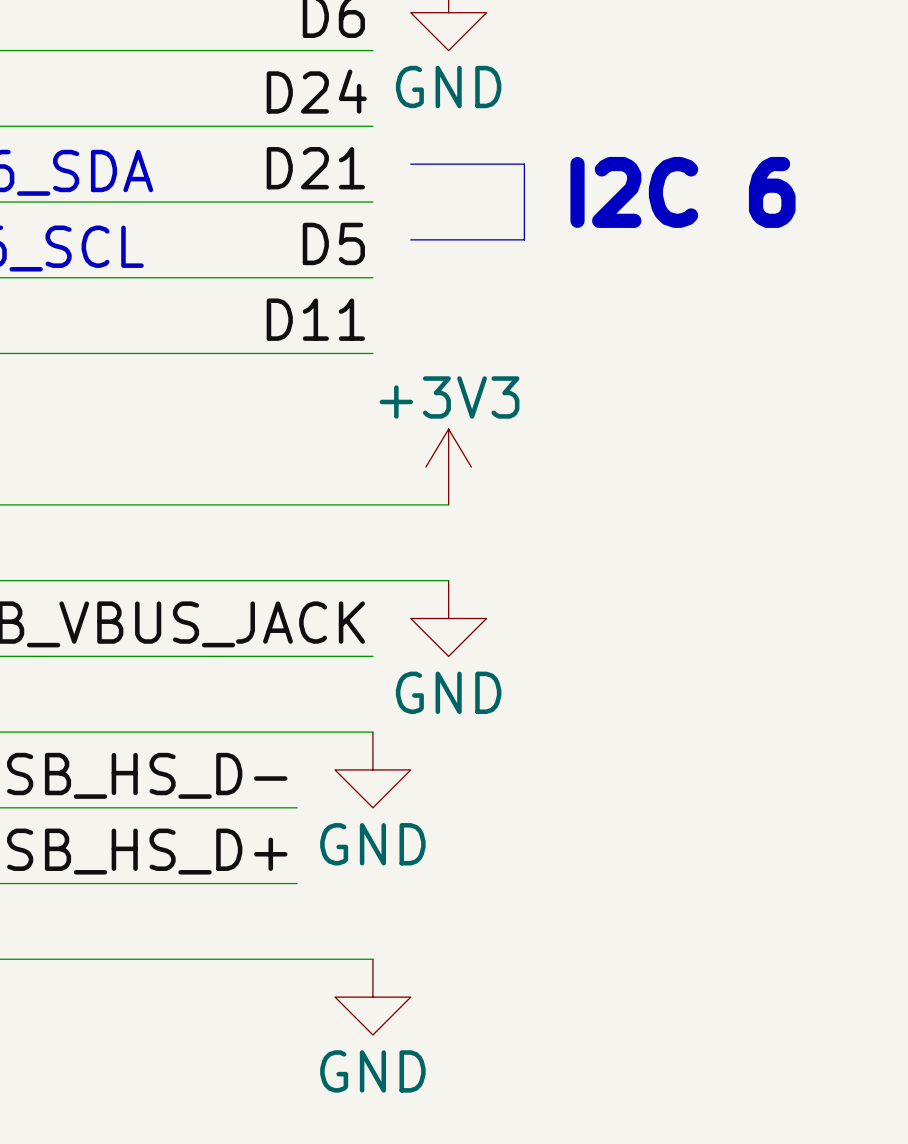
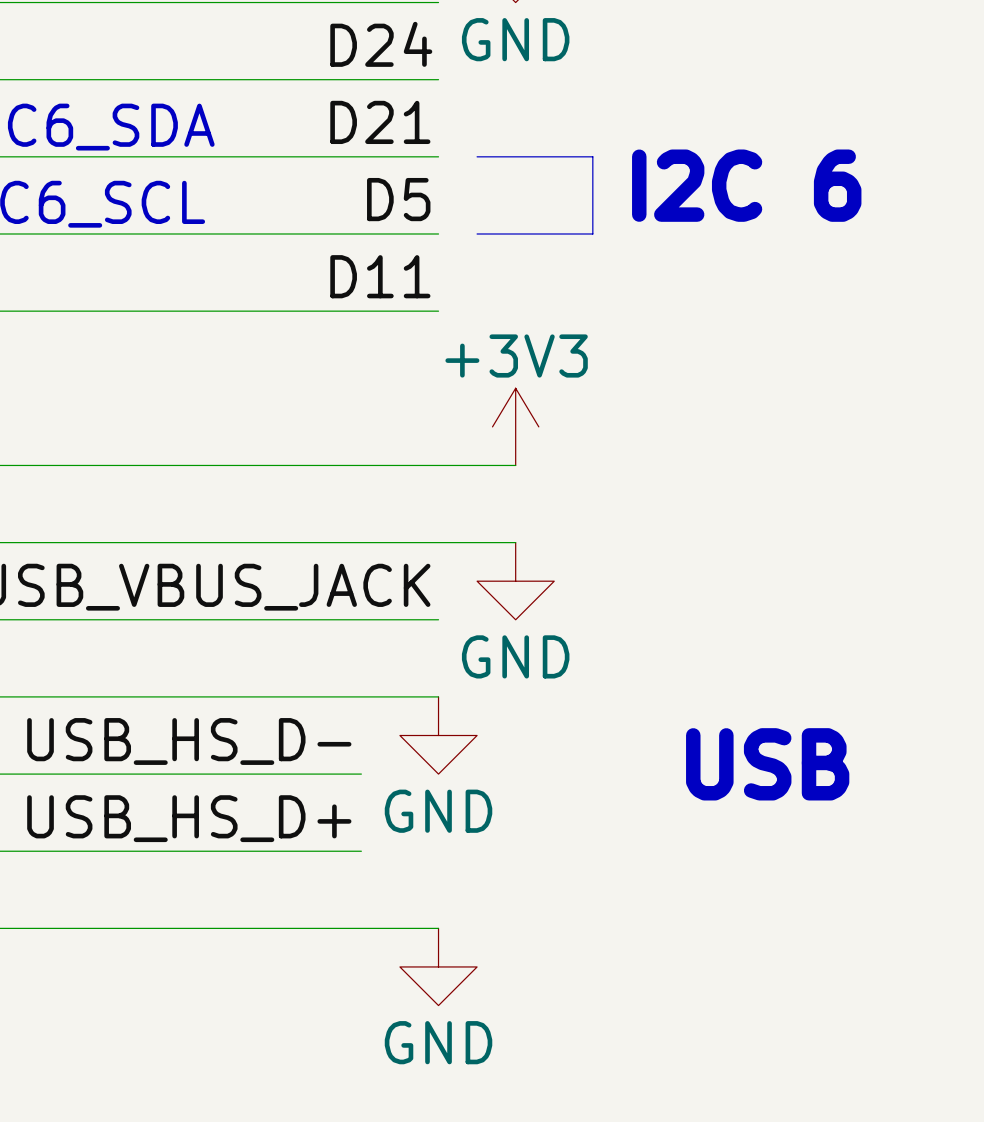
line: (410, 164) (524, 164) (524, 202) -> (477, 156) (592, 156)
text position: I2C 6 (682, 192) -> I2C 6 (746, 185)
line: (410, 239) (524, 239) -> (477, 233) (592, 233) (592, 195)
text: none -> USB (767, 764)

